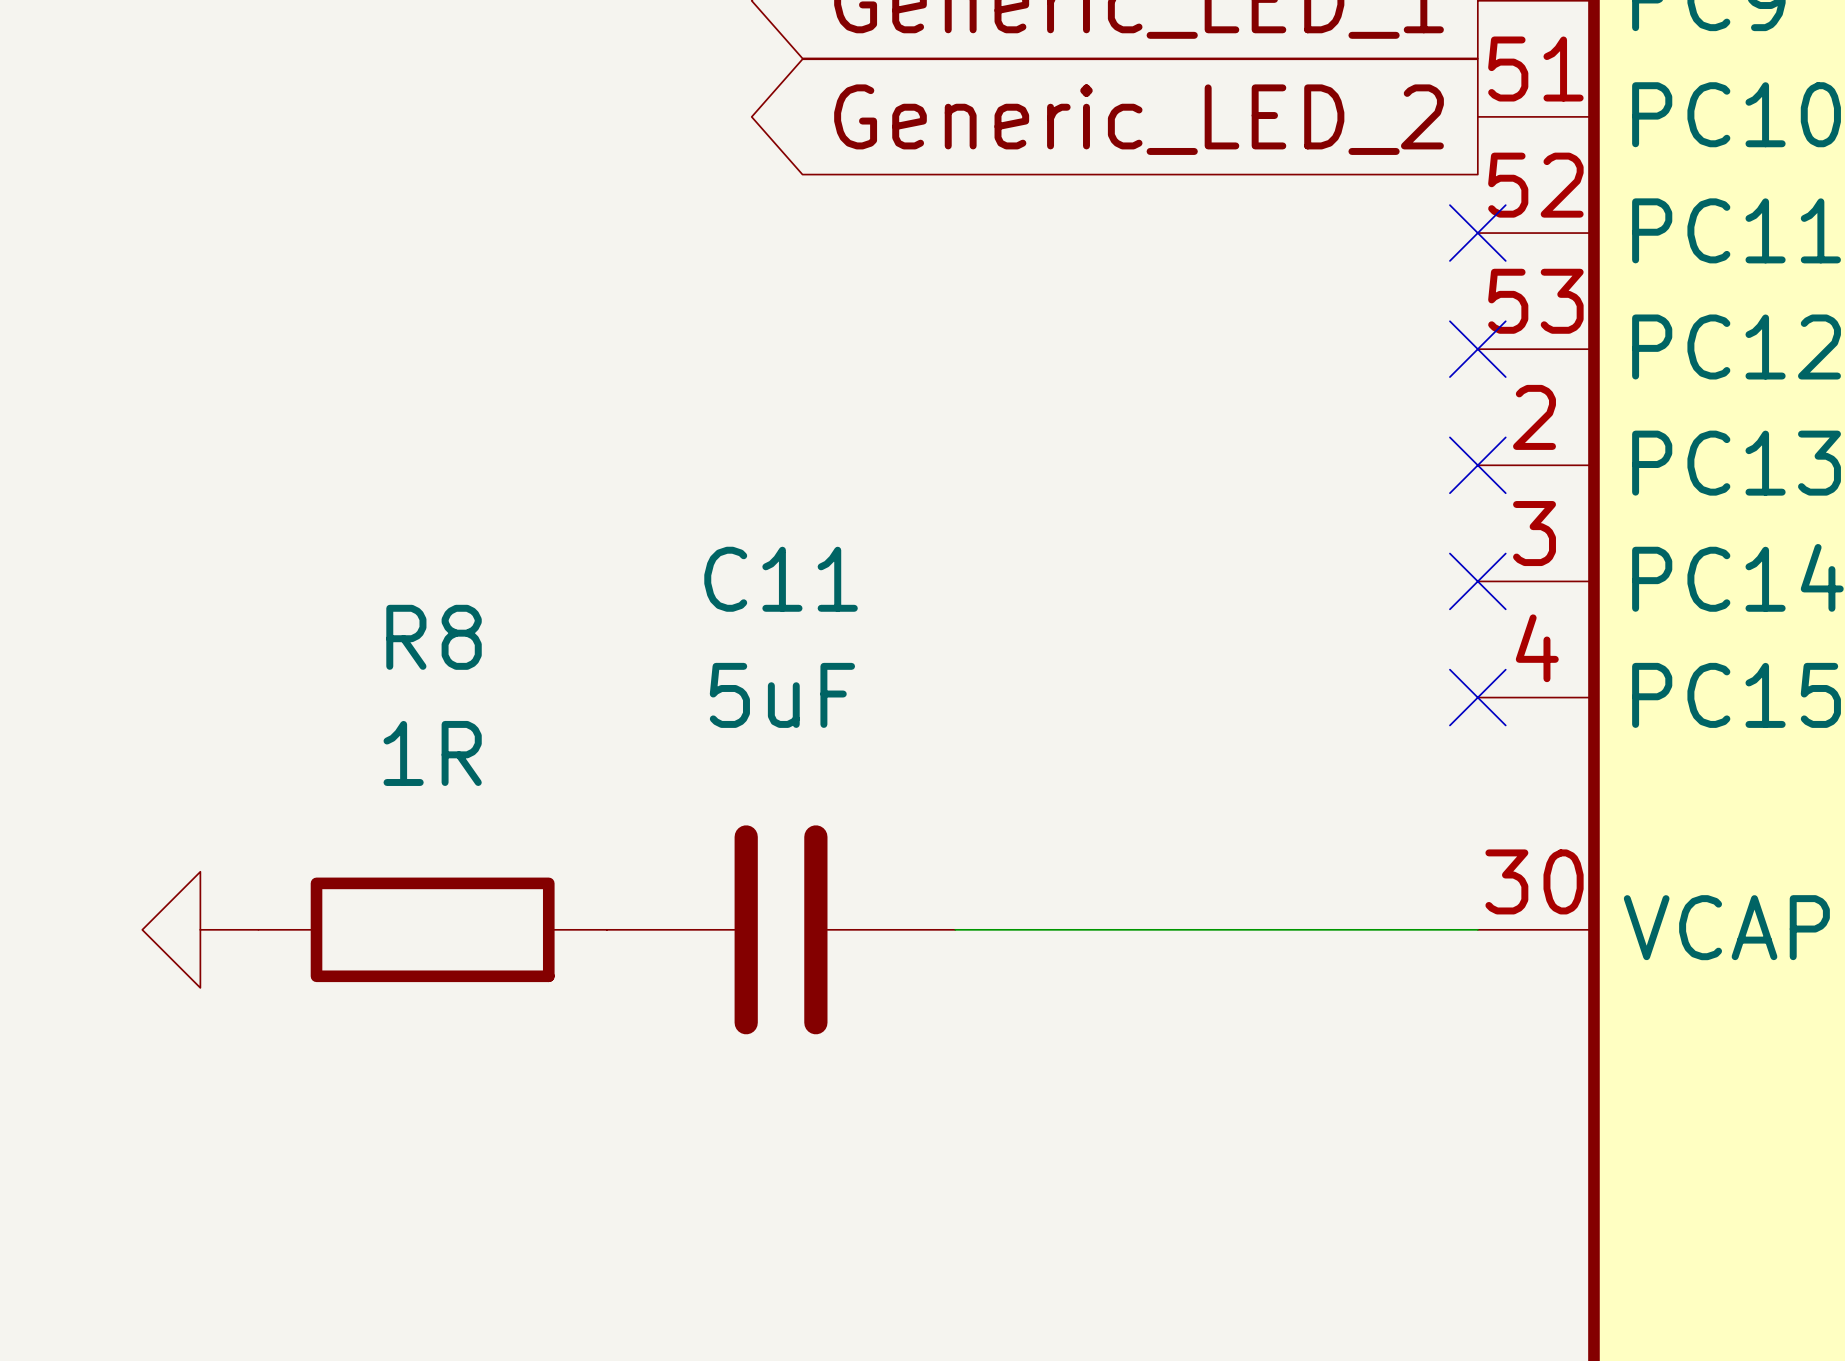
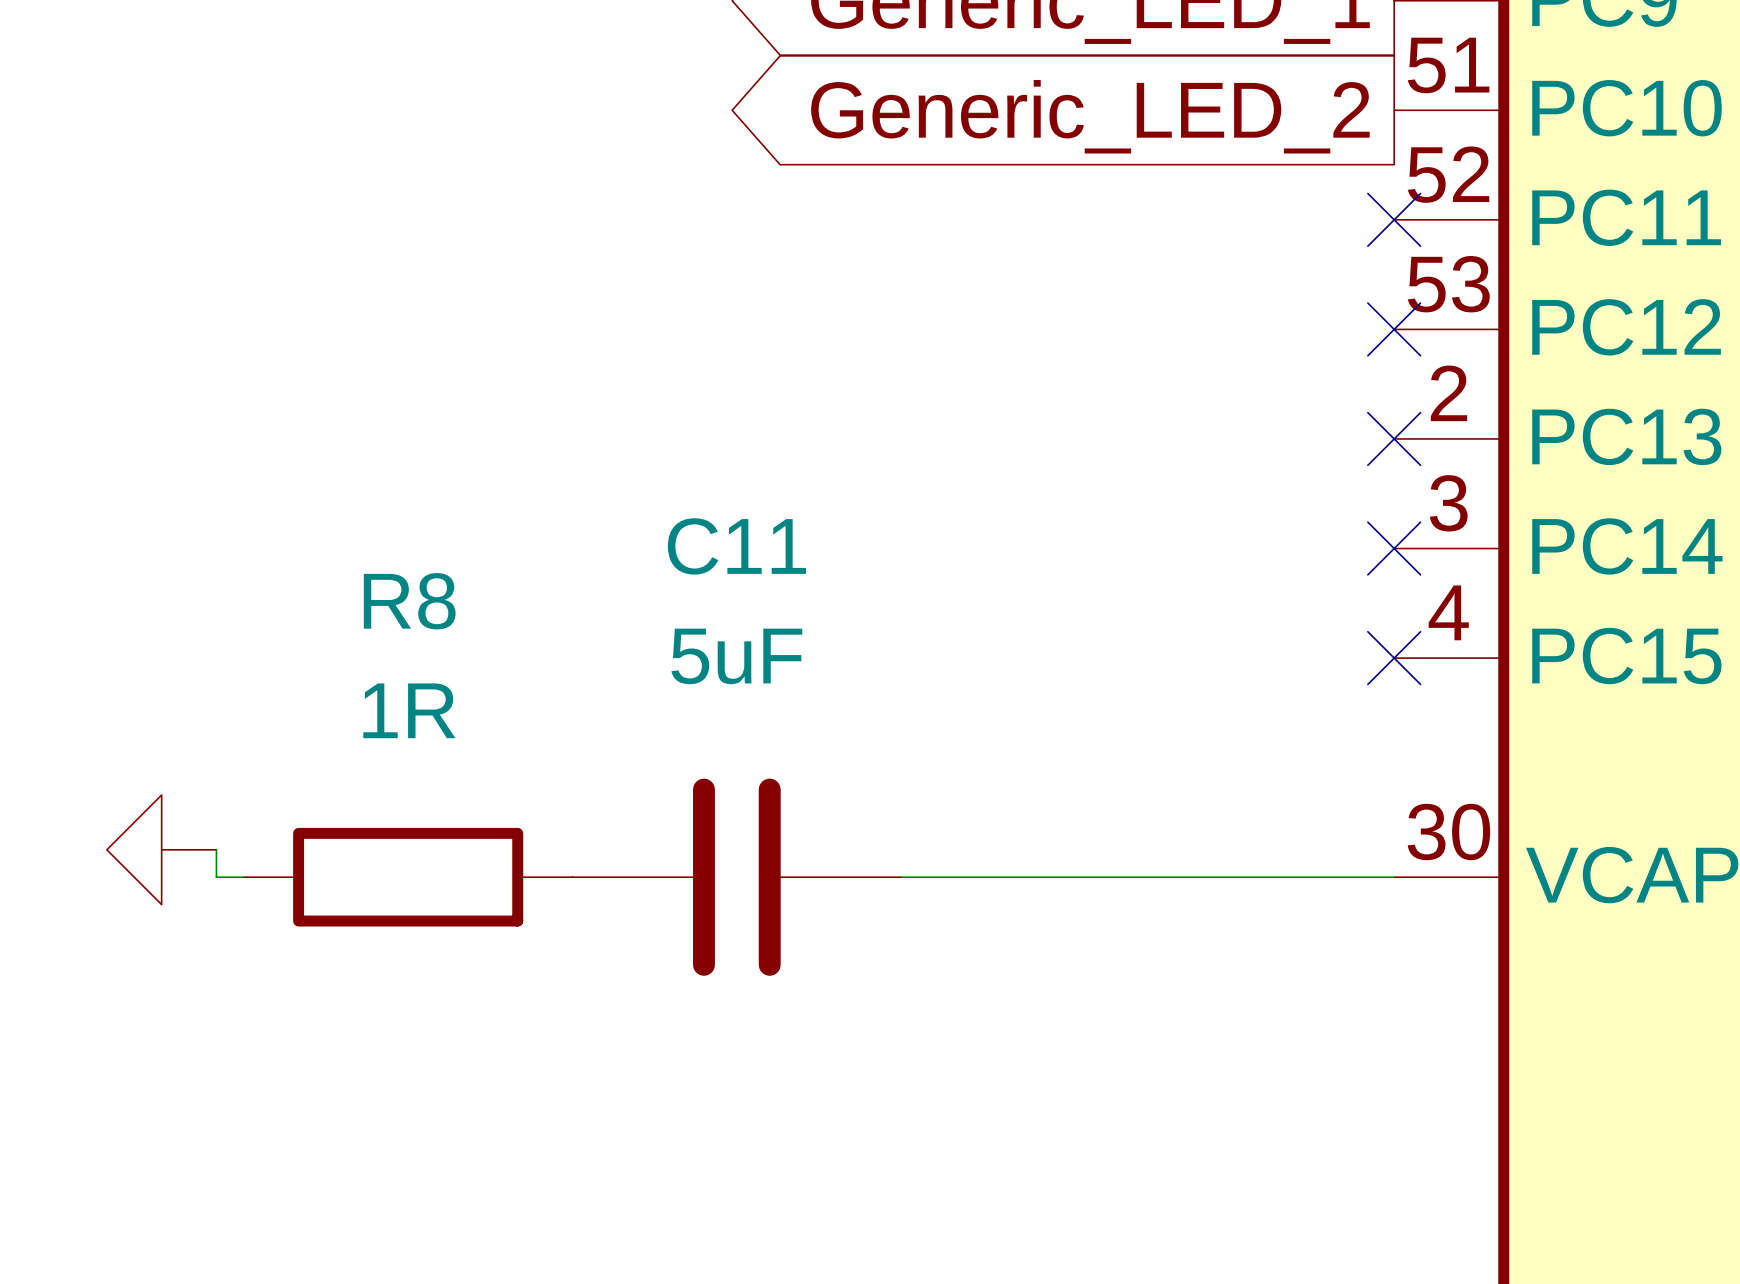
wire: none -> (216, 849) (216, 877) (243, 877)
power symbol position: (200, 929) -> (161, 849)

